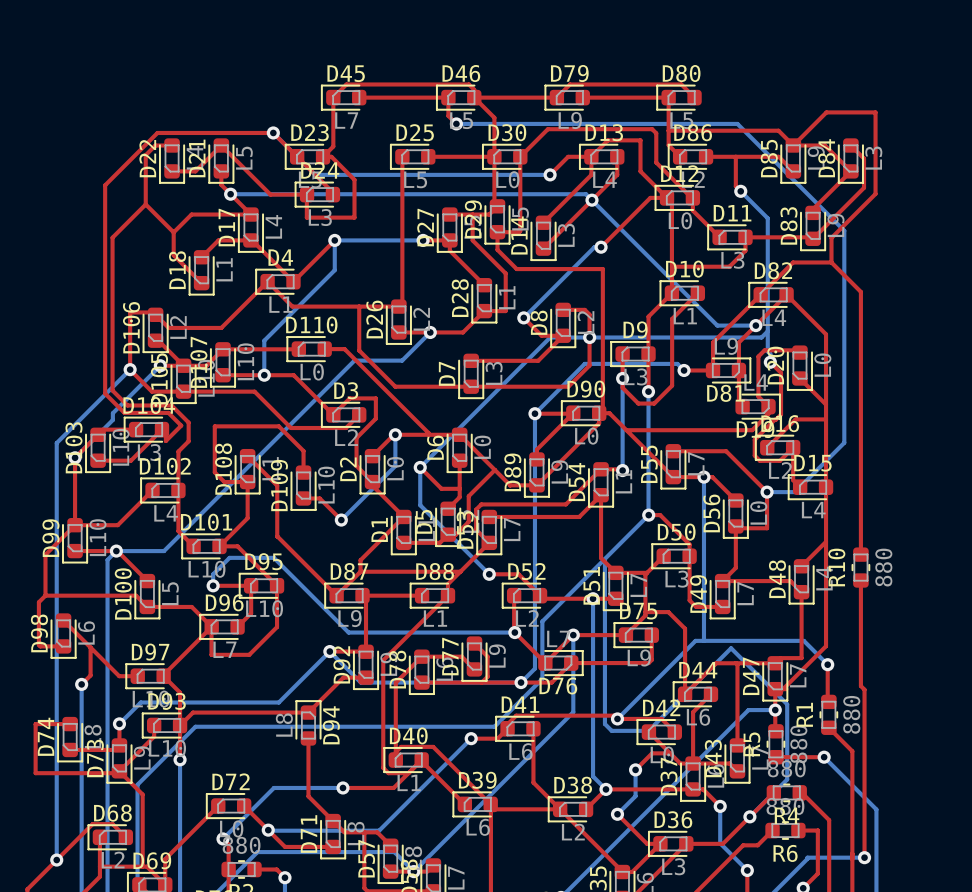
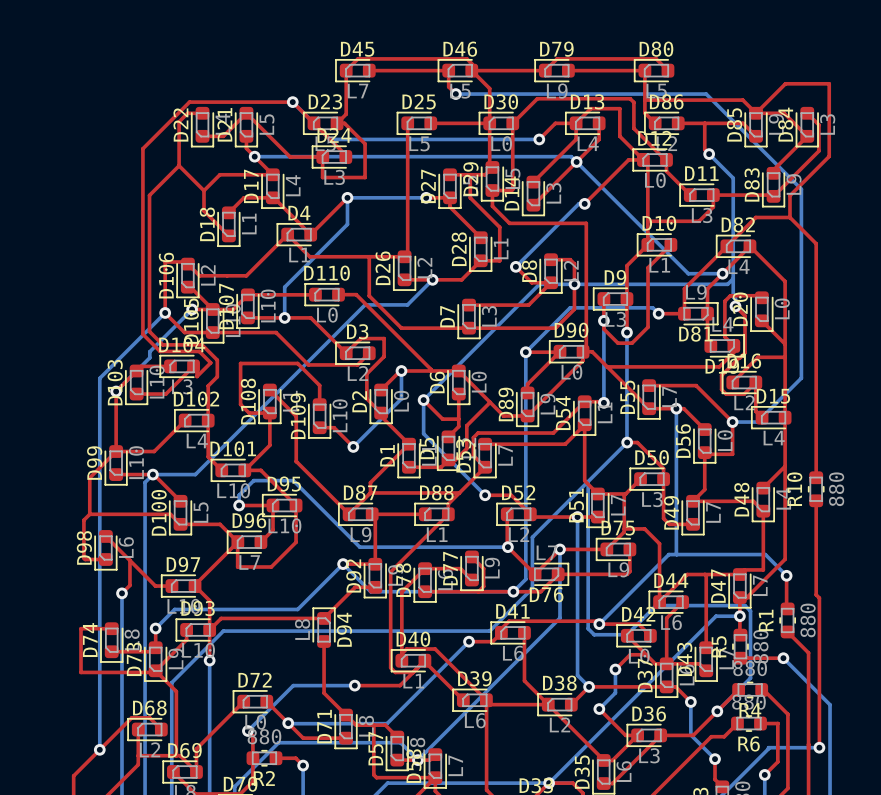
bottom track: (681, 698) (731, 648) (781, 698) -> (656, 605) (745, 605)

